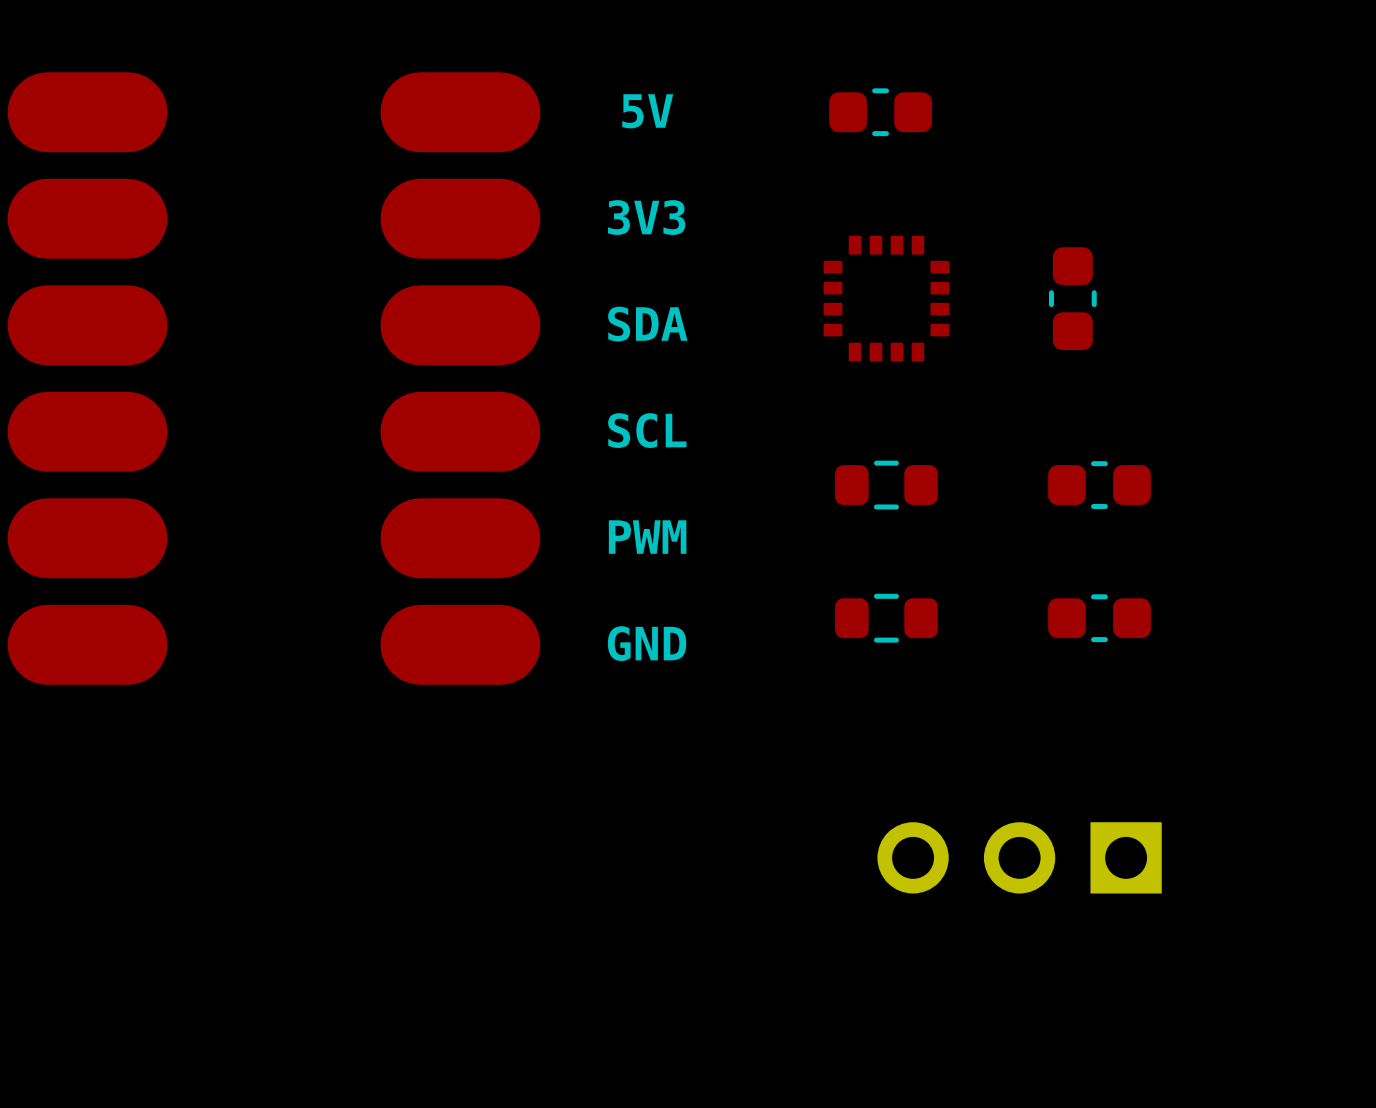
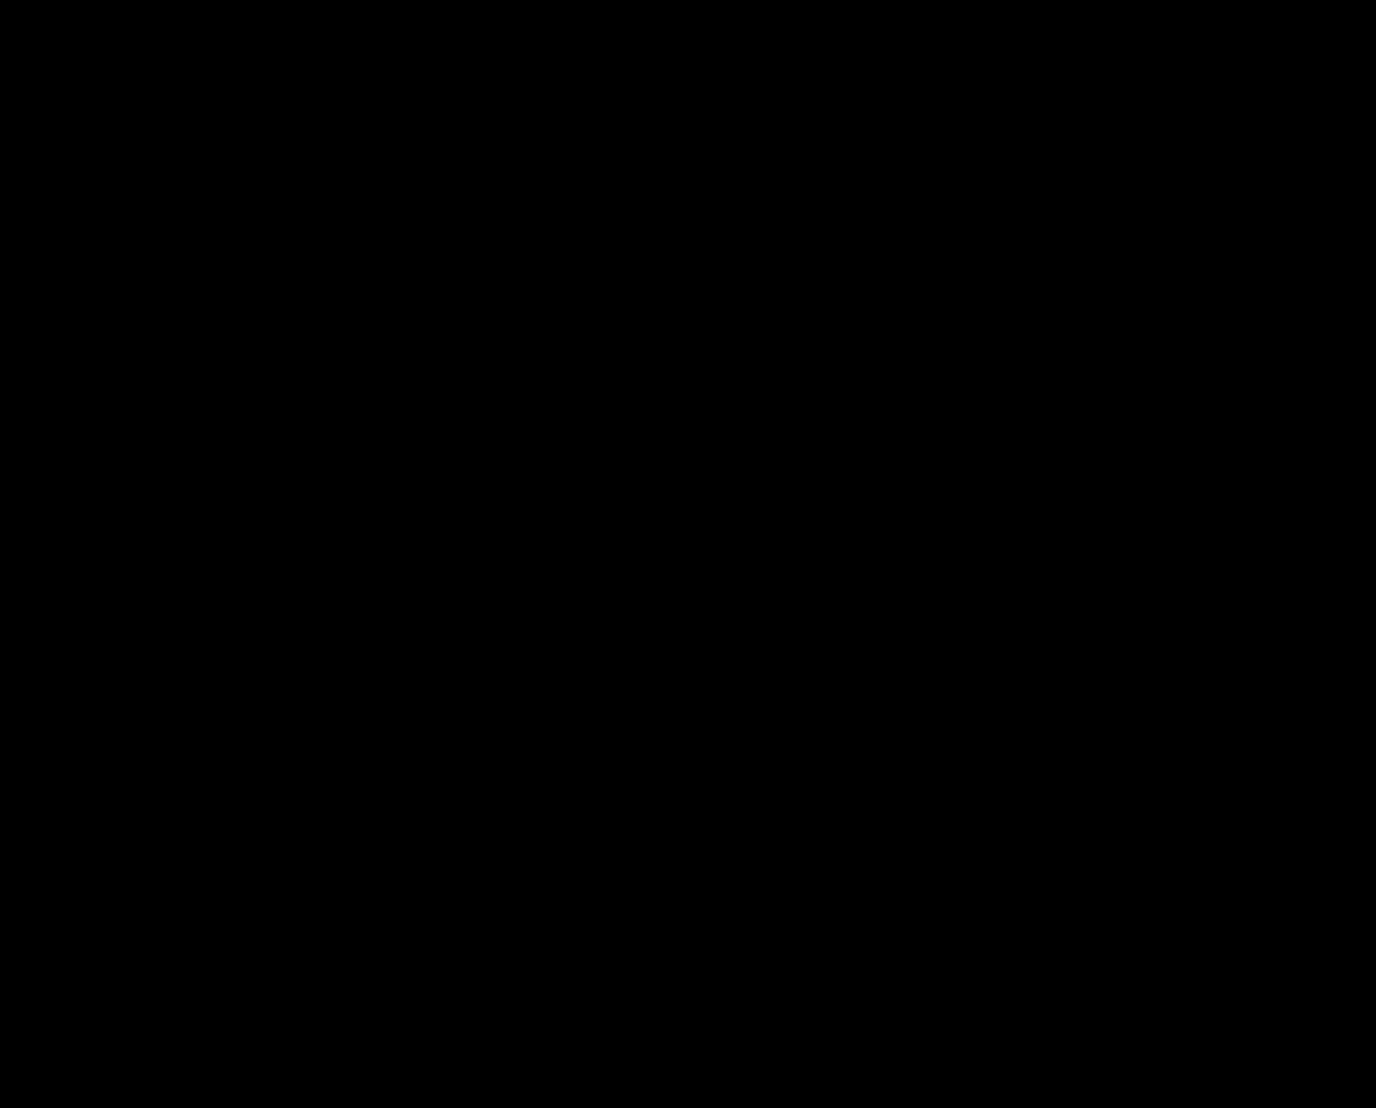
text: 5V (647, 111) -> none
part: (880, 112) -> none
text: 3V3 (646, 217) -> none
part: (886, 298) -> none
part: (1072, 298) -> none
text: SDA (647, 324) -> none
part: (87, 378) -> none
part: (460, 378) -> none
text: SCL (647, 430) -> none
part: (886, 485) -> none
part: (1099, 485) -> none
text: PWM (647, 537) -> none
part: (886, 618) -> none
part: (1099, 618) -> none
text: GND (647, 643) -> none
part: (1019, 857) -> none

